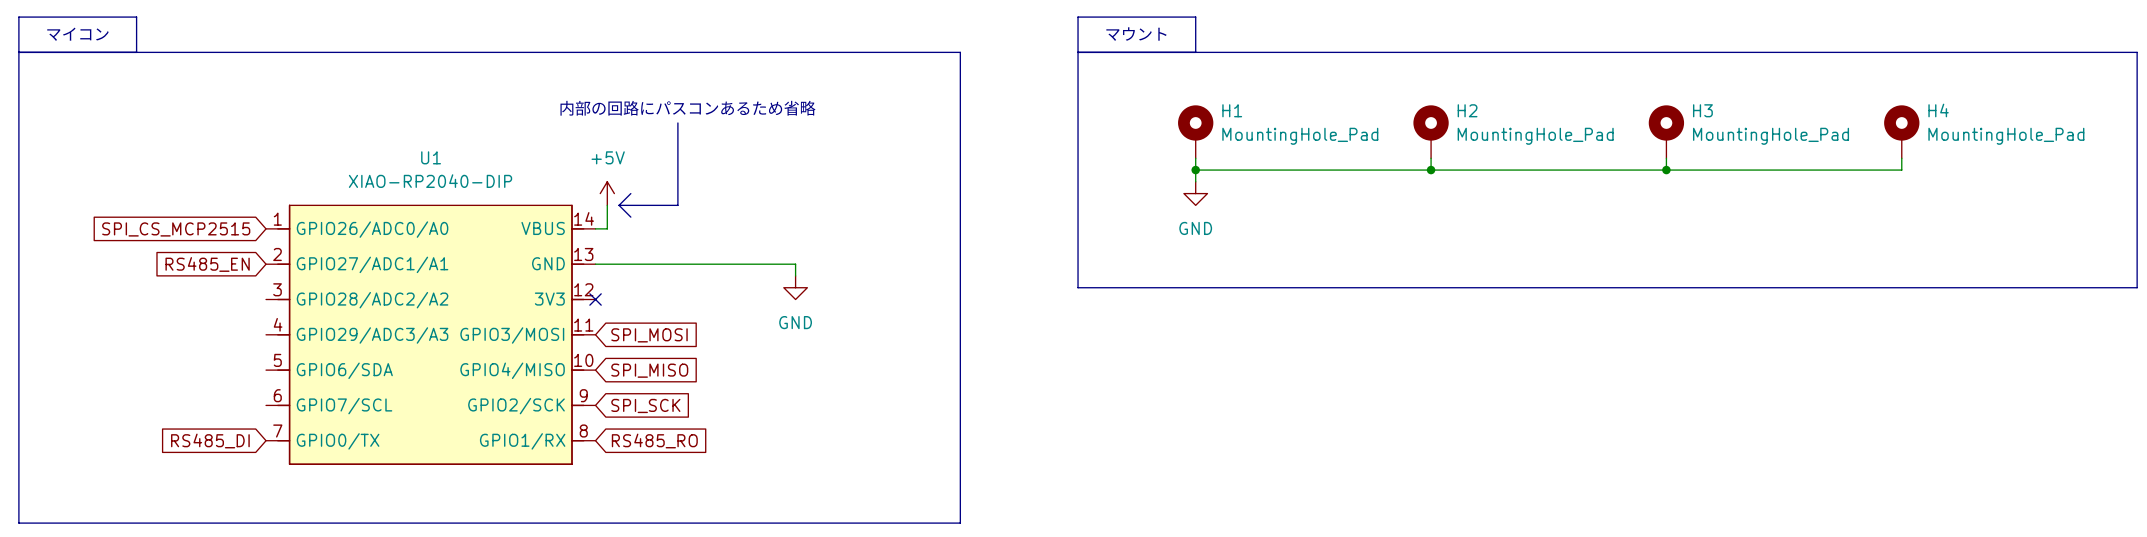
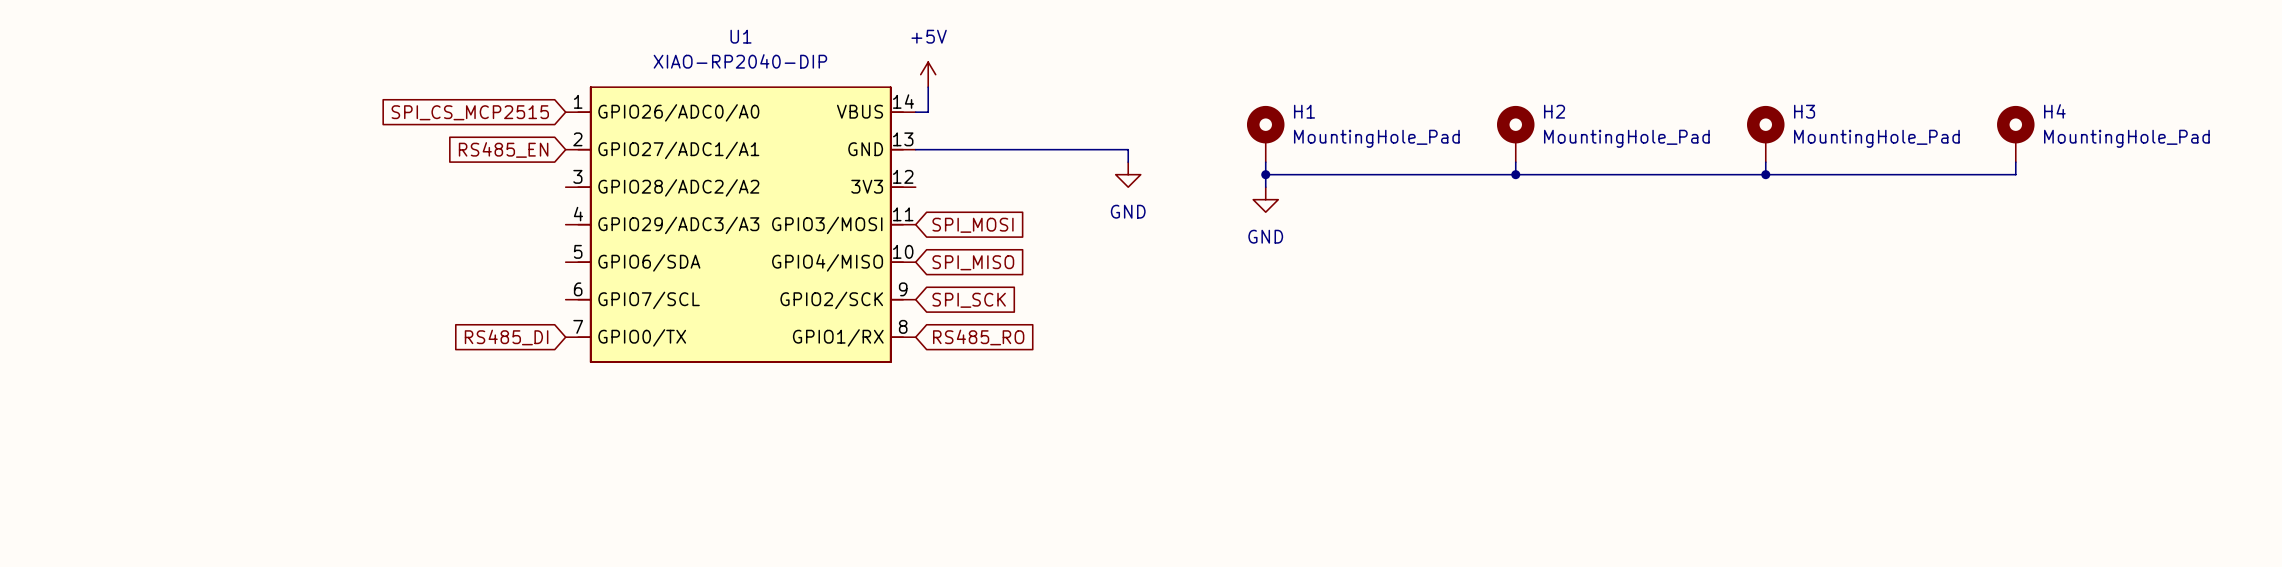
text: マイコン (77, 34) -> none
text: マウント (1136, 34) -> none
line: (18, 52) (960, 52) (960, 523) (18, 523) (18, 17) (136, 17) (136, 52) -> none
line: (1078, 52) (2137, 52) (2137, 287) (1078, 287) (1078, 17) (1195, 17) (1195, 52) -> none
power symbol: none -> +5V (928, 74)
wire: none -> (928, 87) (928, 112) (915, 112)
text: 内部の回路にパスコンあるため省略 (688, 108) -> none
global label: none -> SPI_CS_MCP2515 (470, 112)
line: (677, 122) (677, 205) (619, 205) -> none
global label: none -> RS485_EN (503, 149)
wire: none -> (915, 149) (1128, 149) (1128, 162)
power symbol: none -> GND (1128, 174)
power symbol: +5V (607, 193) -> none
line: (630, 193) (619, 205) -> none
line: (619, 205) (630, 217) -> none
global label: none -> SPI_MOSI (973, 225)
global label: SPI_CS_MCP2515 (176, 229) -> none
global label: none -> SPI_MISO (973, 262)
global label: RS485_EN (207, 264) -> none
power symbol: GND (795, 287) -> none
global label: none -> SPI_SCK (969, 300)
no-connect mark: (595, 299) -> none
global label: none -> RS485_DI (506, 337)
global label: none -> RS485_RO (978, 337)
U1 position: (430, 334) -> (740, 224)
global label: SPI_MOSI (649, 335) -> none
global label: SPI_MISO (649, 370) -> none
global label: SPI_SCK (645, 405) -> none
global label: RS485_DI (210, 440) -> none
global label: RS485_RO (654, 440) -> none

